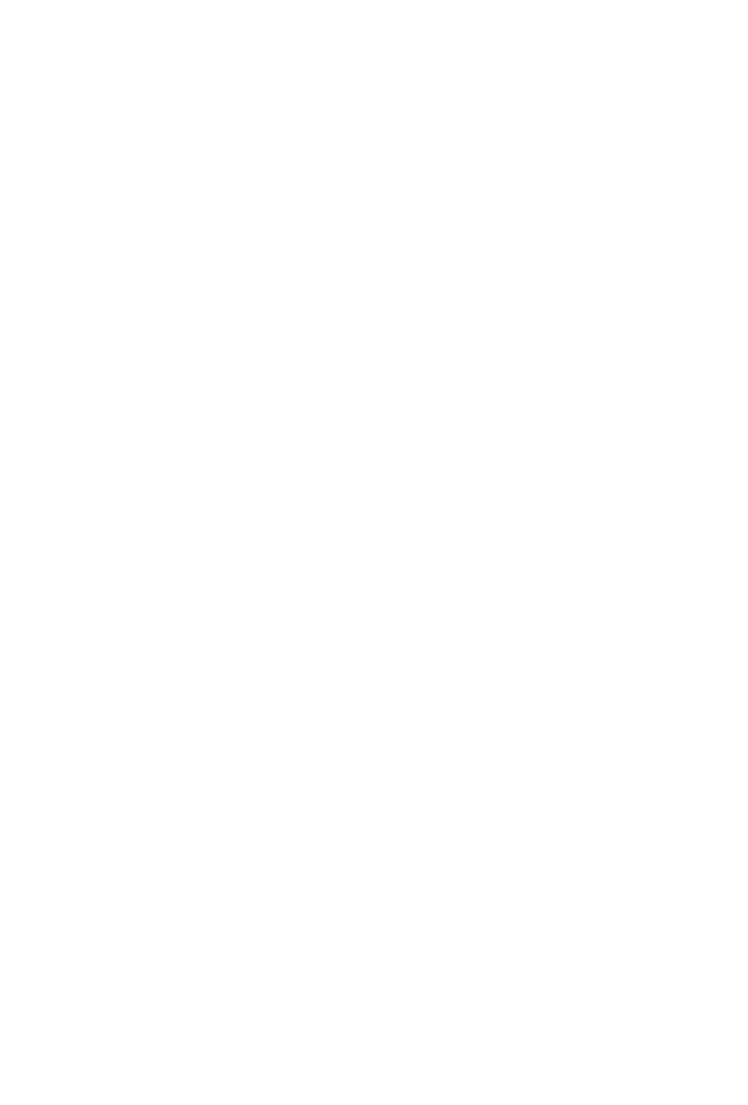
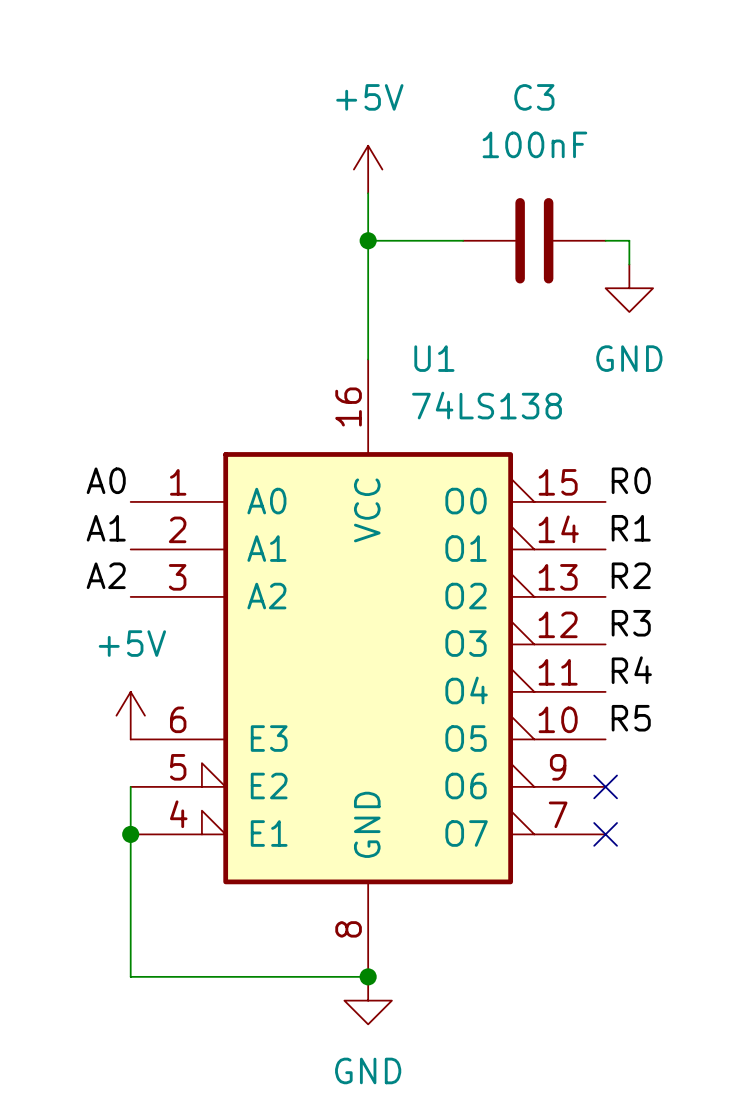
power symbol: none -> +5V (368, 169)
wire: none -> (368, 193) (368, 359)
wire: none -> (368, 240) (463, 240)
junction: none -> (368, 240)
C3: none -> 100nF (534, 240)
wire: none -> (605, 240) (629, 240) (629, 264)
power symbol: none -> GND (629, 288)
label: none -> A0 (106, 480)
label: none -> R0 (631, 480)
label: none -> A1 (106, 528)
label: none -> R1 (631, 528)
label: none -> A2 (106, 575)
label: none -> R2 (631, 575)
label: none -> R3 (631, 623)
U1: none -> 74LS138 (368, 668)
label: none -> R4 (631, 670)
power symbol: none -> +5V (130, 715)
label: none -> R5 (631, 718)
wire: none -> (130, 786) (130, 976) (368, 976)
no-connect mark: none -> (605, 786)
junction: none -> (130, 834)
no-connect mark: none -> (605, 834)
junction: none -> (368, 976)
power symbol: none -> GND (368, 1000)

